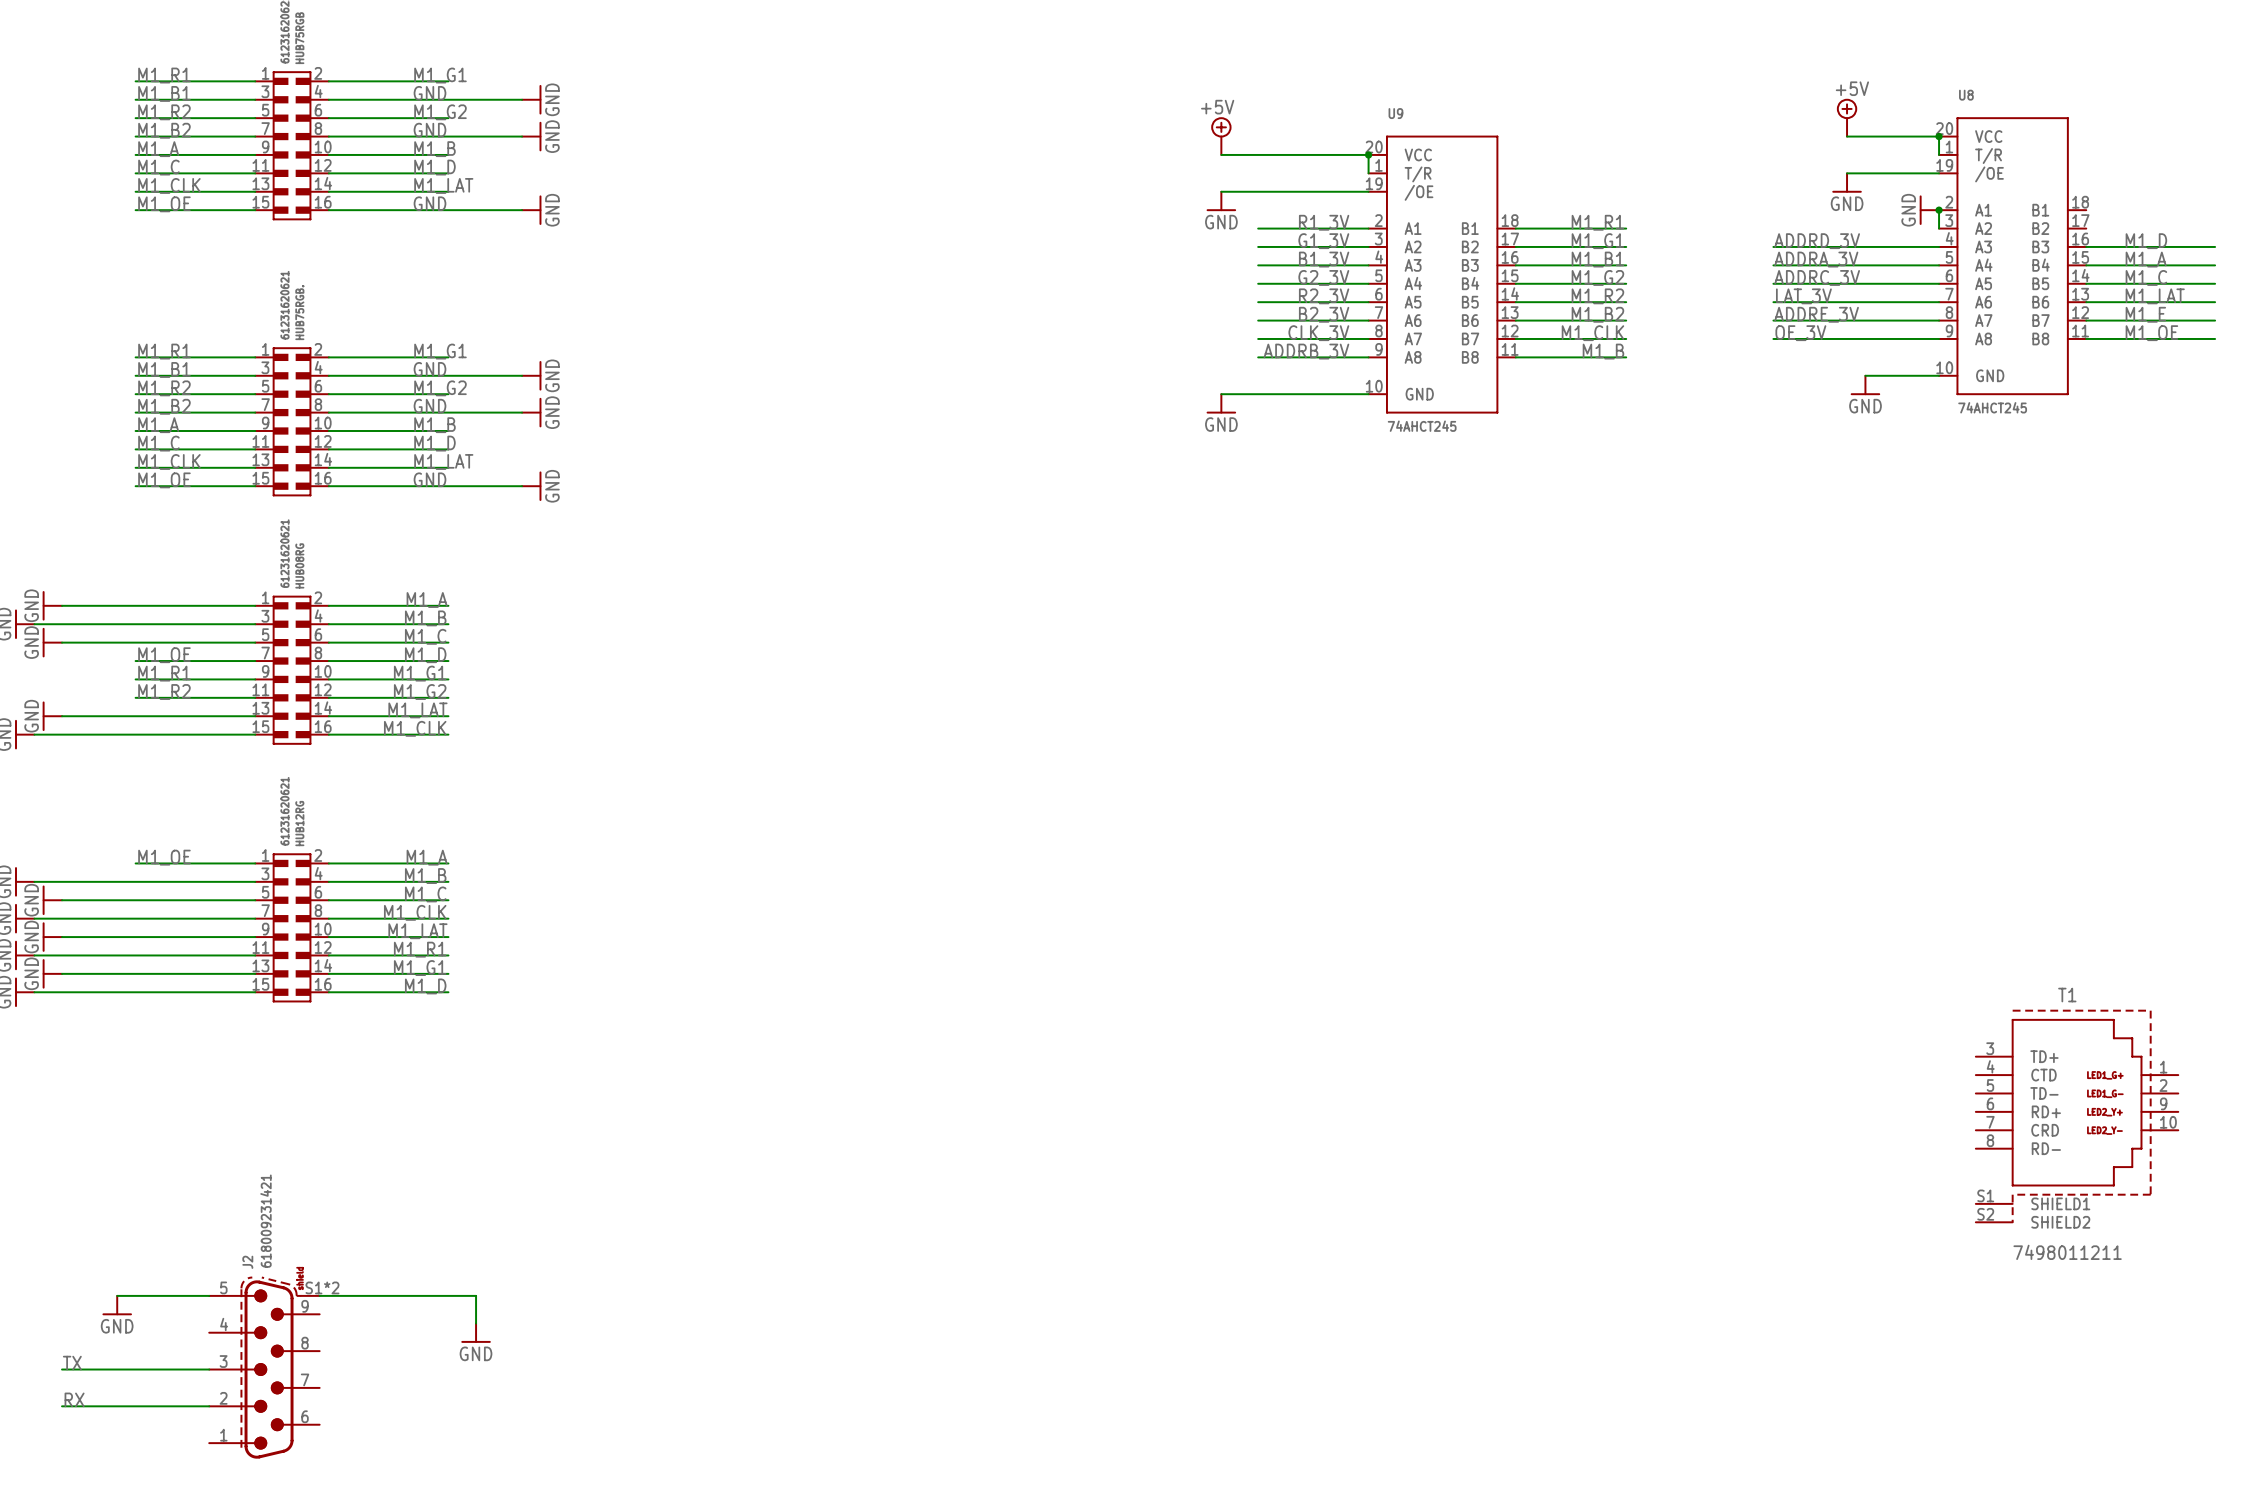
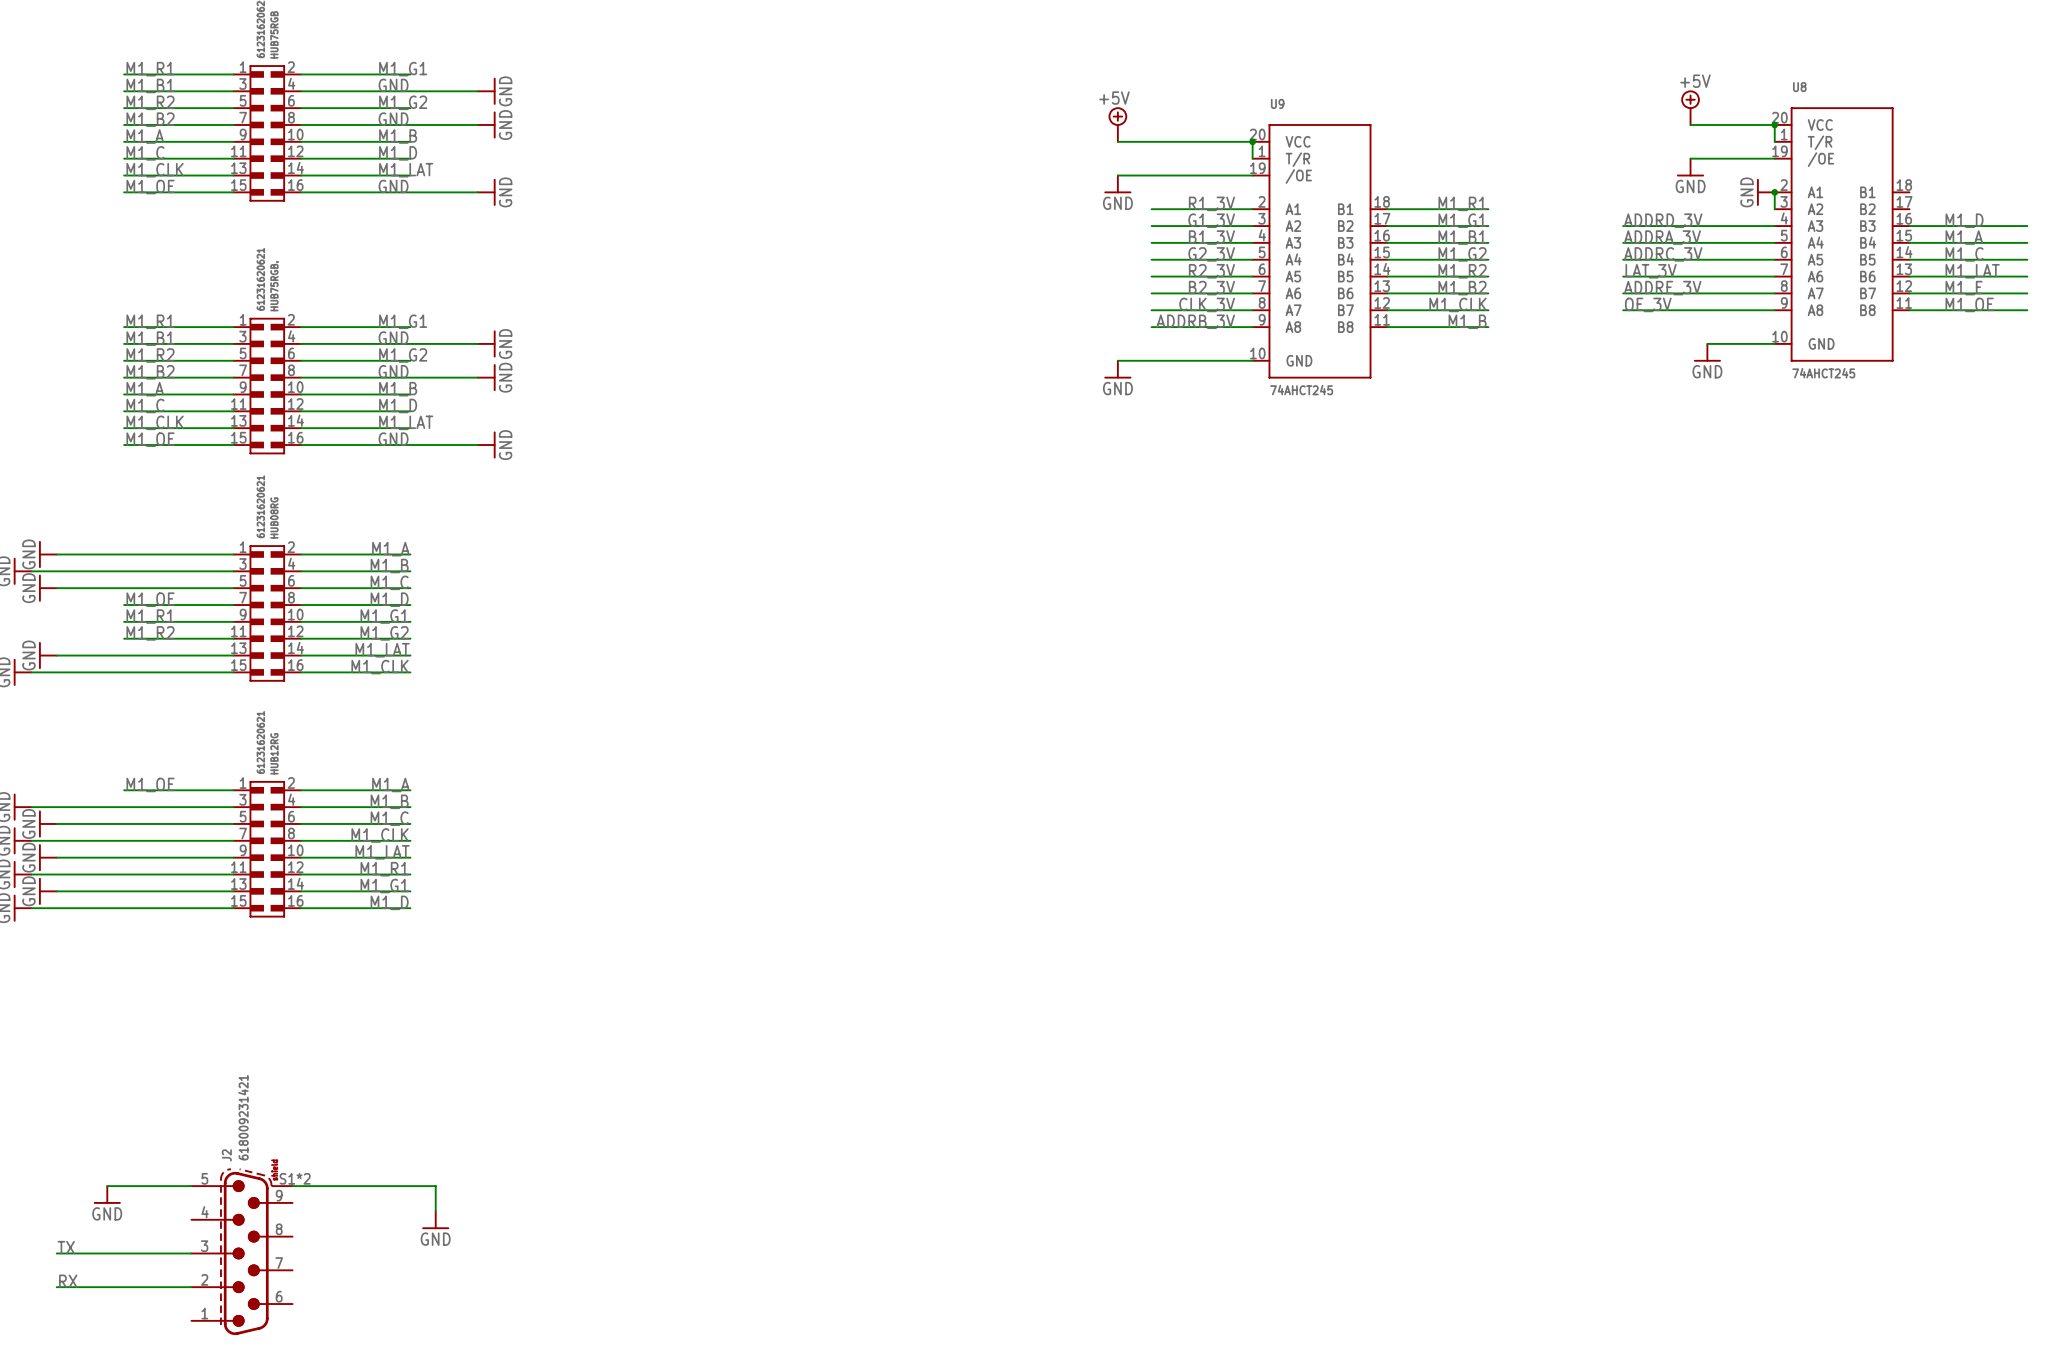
T1: 7498011211 (2077, 1116) -> none

